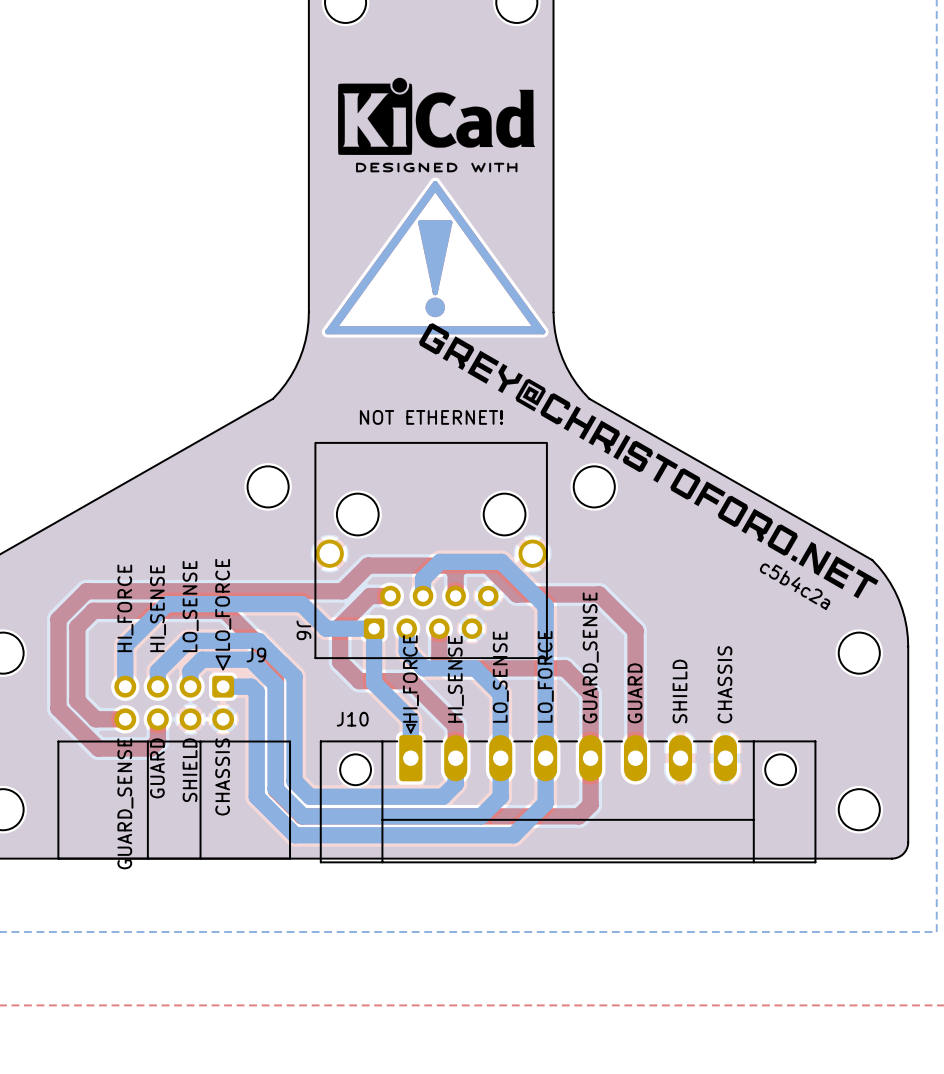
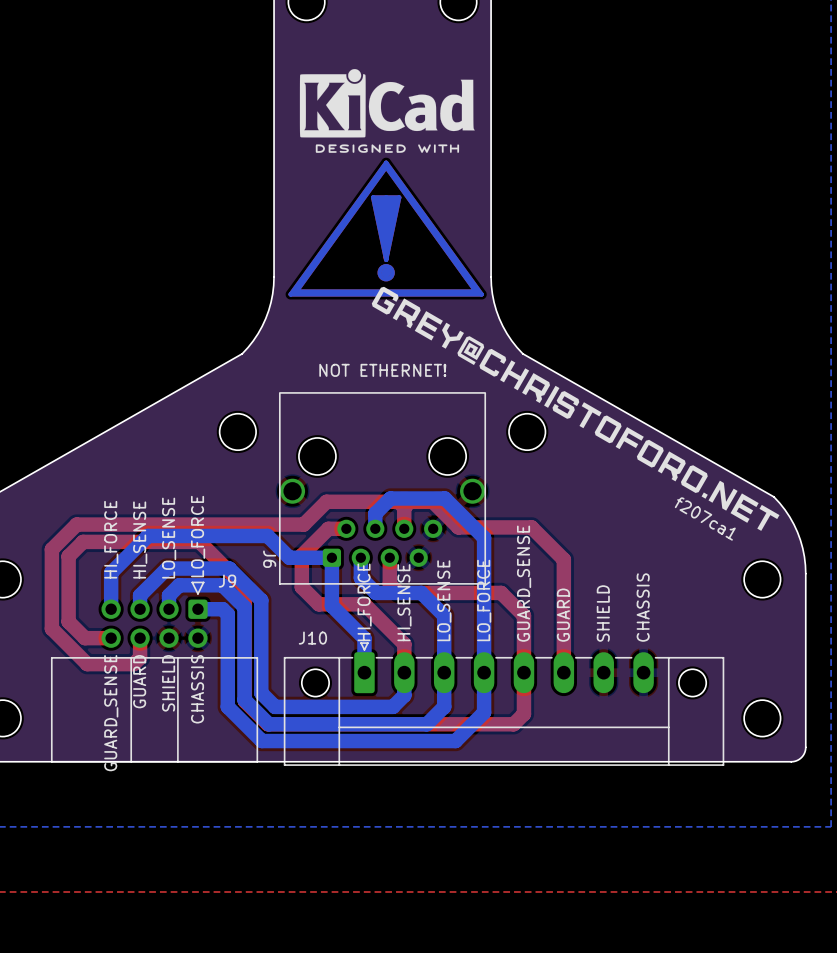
text: c5b4c2a (795, 586) -> f207ca1 (705, 519)

